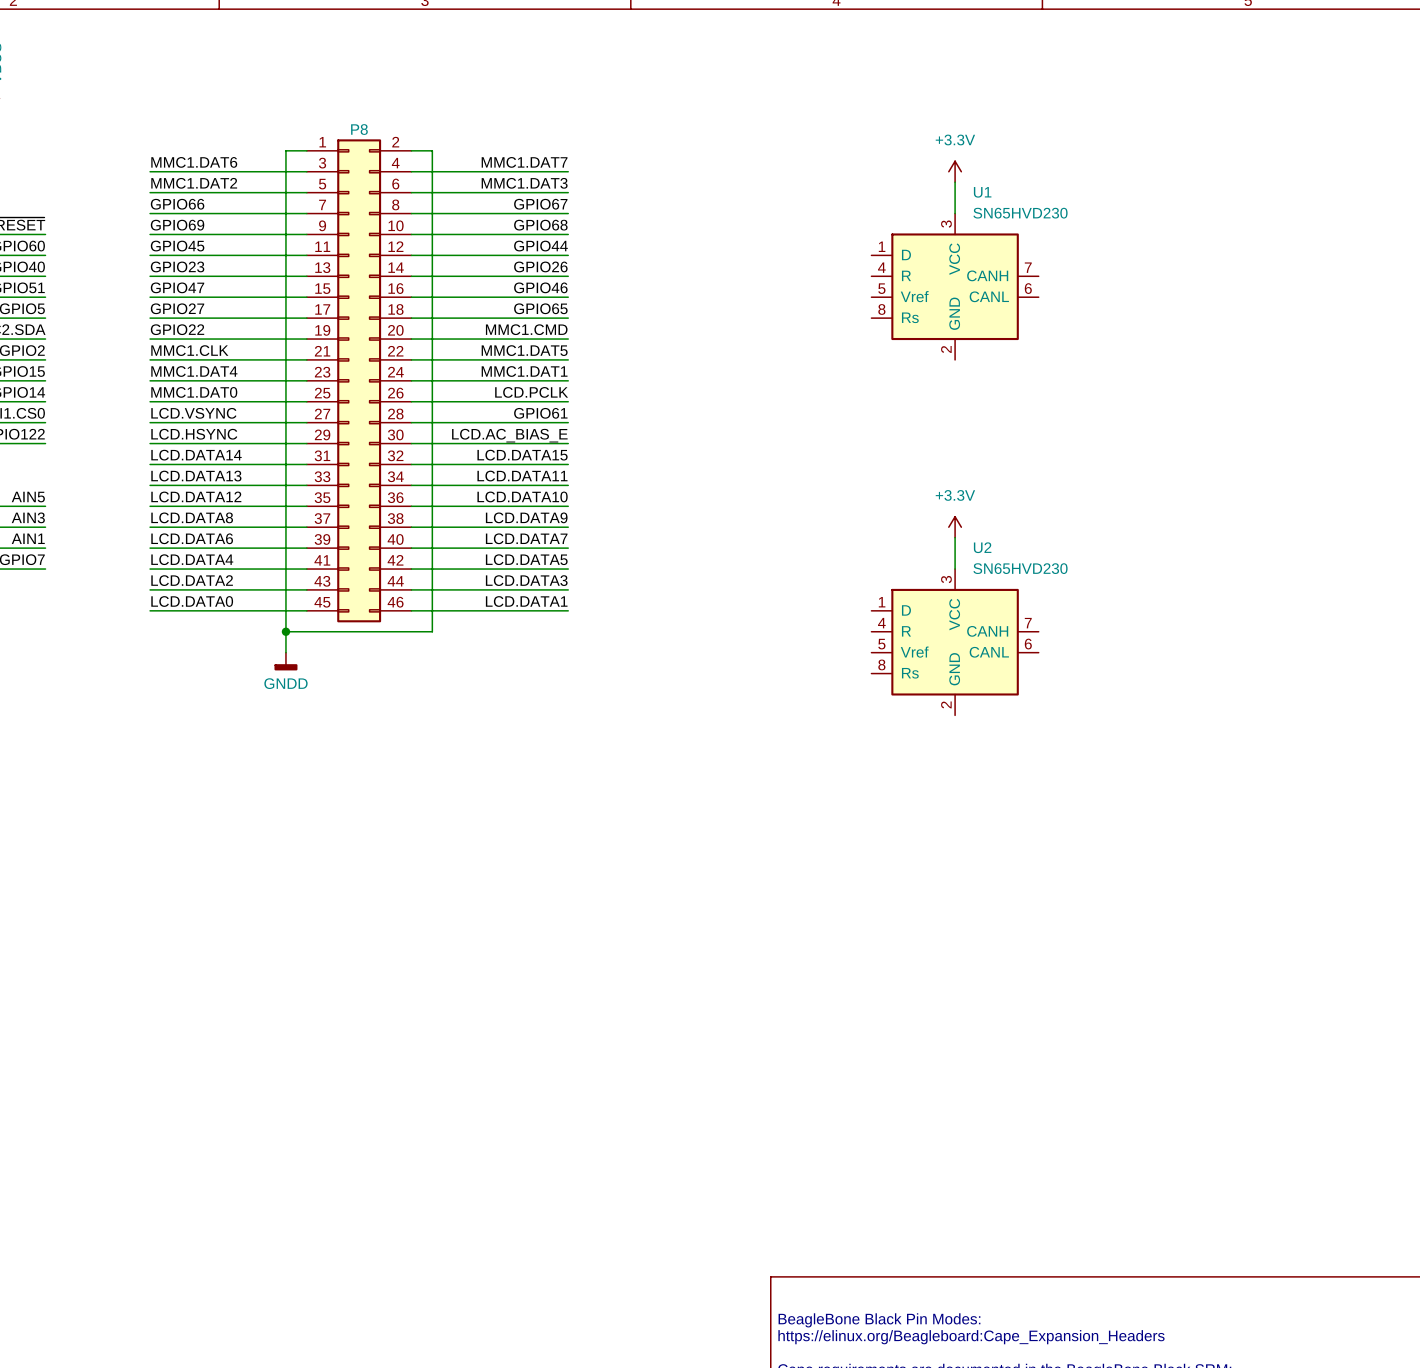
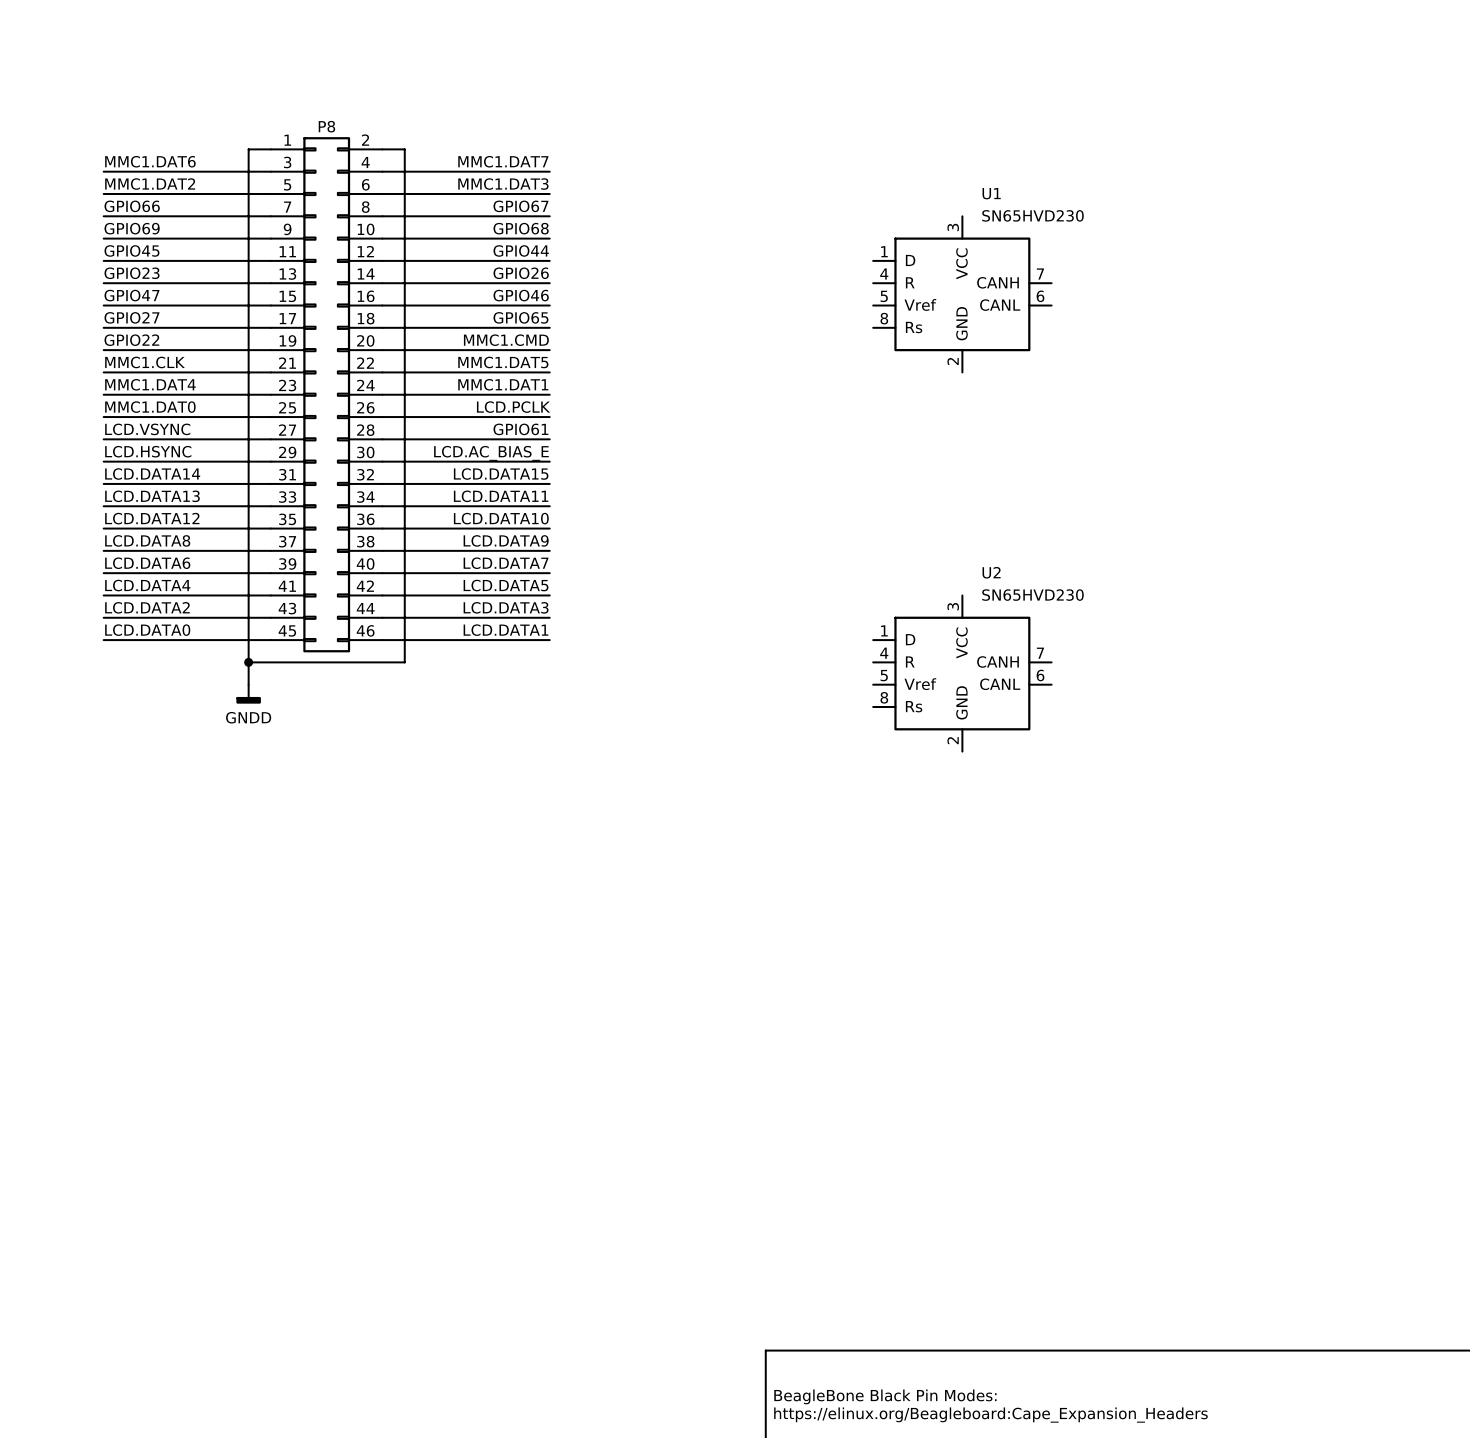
power symbol: +3.3V (955, 171) -> none
wire: (955, 182) (955, 213) -> none
power symbol: +3.3V (955, 527) -> none
wire: (955, 537) (955, 569) -> none

